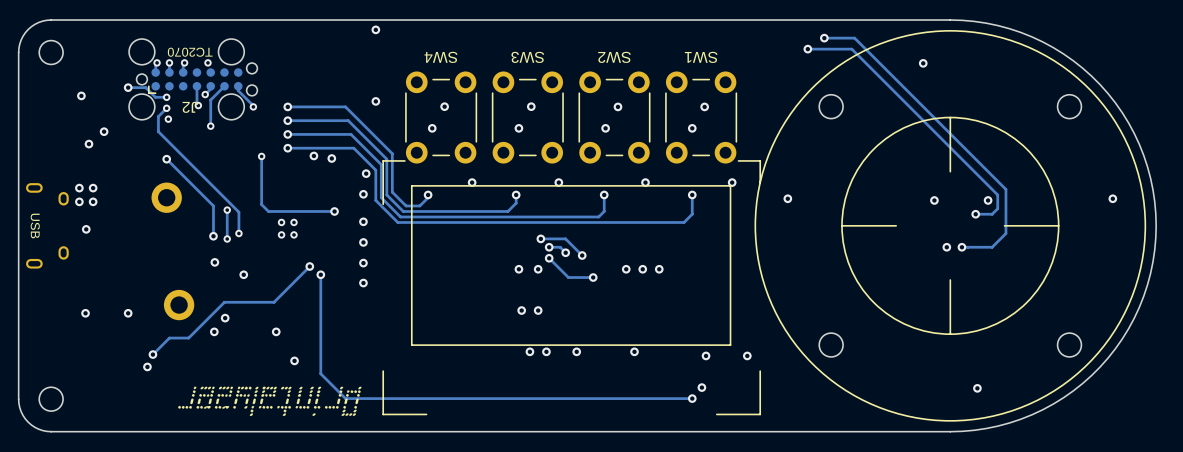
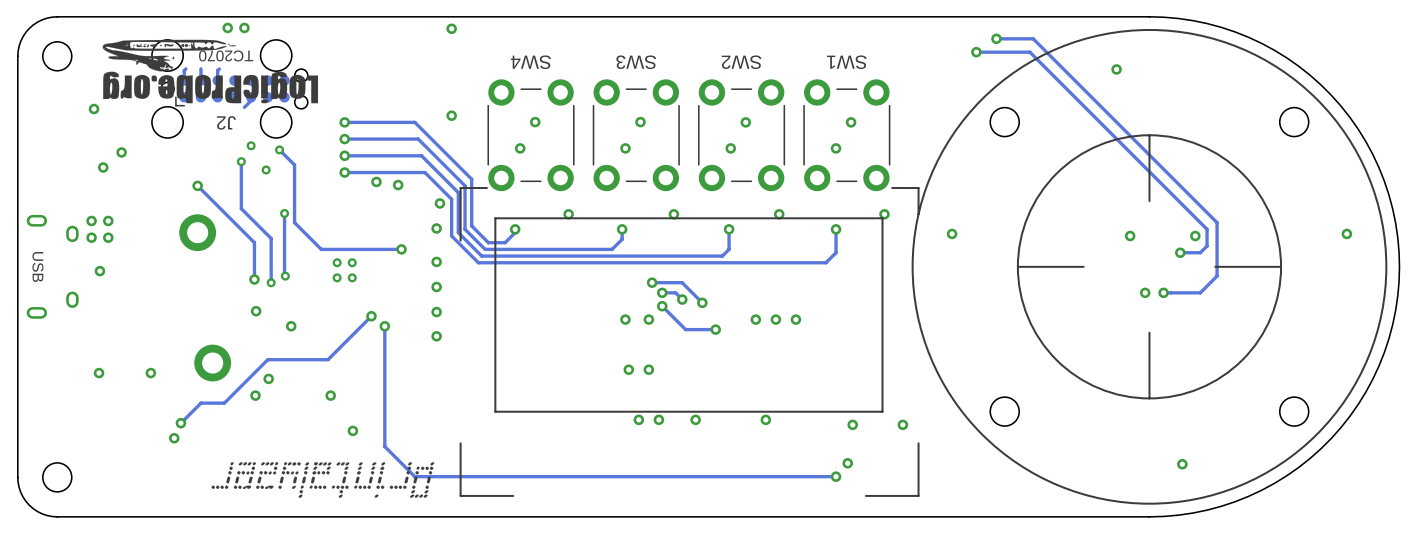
via: none -> (227, 27)
via: none -> (244, 27)
drawing: none -> [102, 39, 319, 104]
via: (157, 62) -> none
via: (169, 62) -> none
via: (184, 62) -> none
via: (207, 62) -> none
track: (196, 86) (198, 105) -> none
track: (224, 86) (210, 100) (210, 126) -> none
track: (238, 86) (238, 90) (253, 106) -> none
track: (128, 87) (145, 87) (155, 97) (166, 97) -> none
via: (128, 87) -> none
via: (205, 94) -> none
via: (166, 97) -> none
via: (198, 105) -> none
via: (253, 106) -> none
track: (166, 108) (158, 116) (158, 131) (238, 212) (238, 233) -> (284, 213) (285, 276)
via: (166, 108) -> none
via: (168, 119) -> none
via: none -> (279, 149)
track: none -> (241, 161) (241, 208) (271, 238) (271, 247)
via: none -> (241, 161)
via: none -> (266, 170)
track: (261, 156) (261, 204) -> (279, 149) (294, 164) (294, 222) (312, 241)
via: (261, 156) -> none
via: none -> (284, 213)
via: (227, 210) -> none

